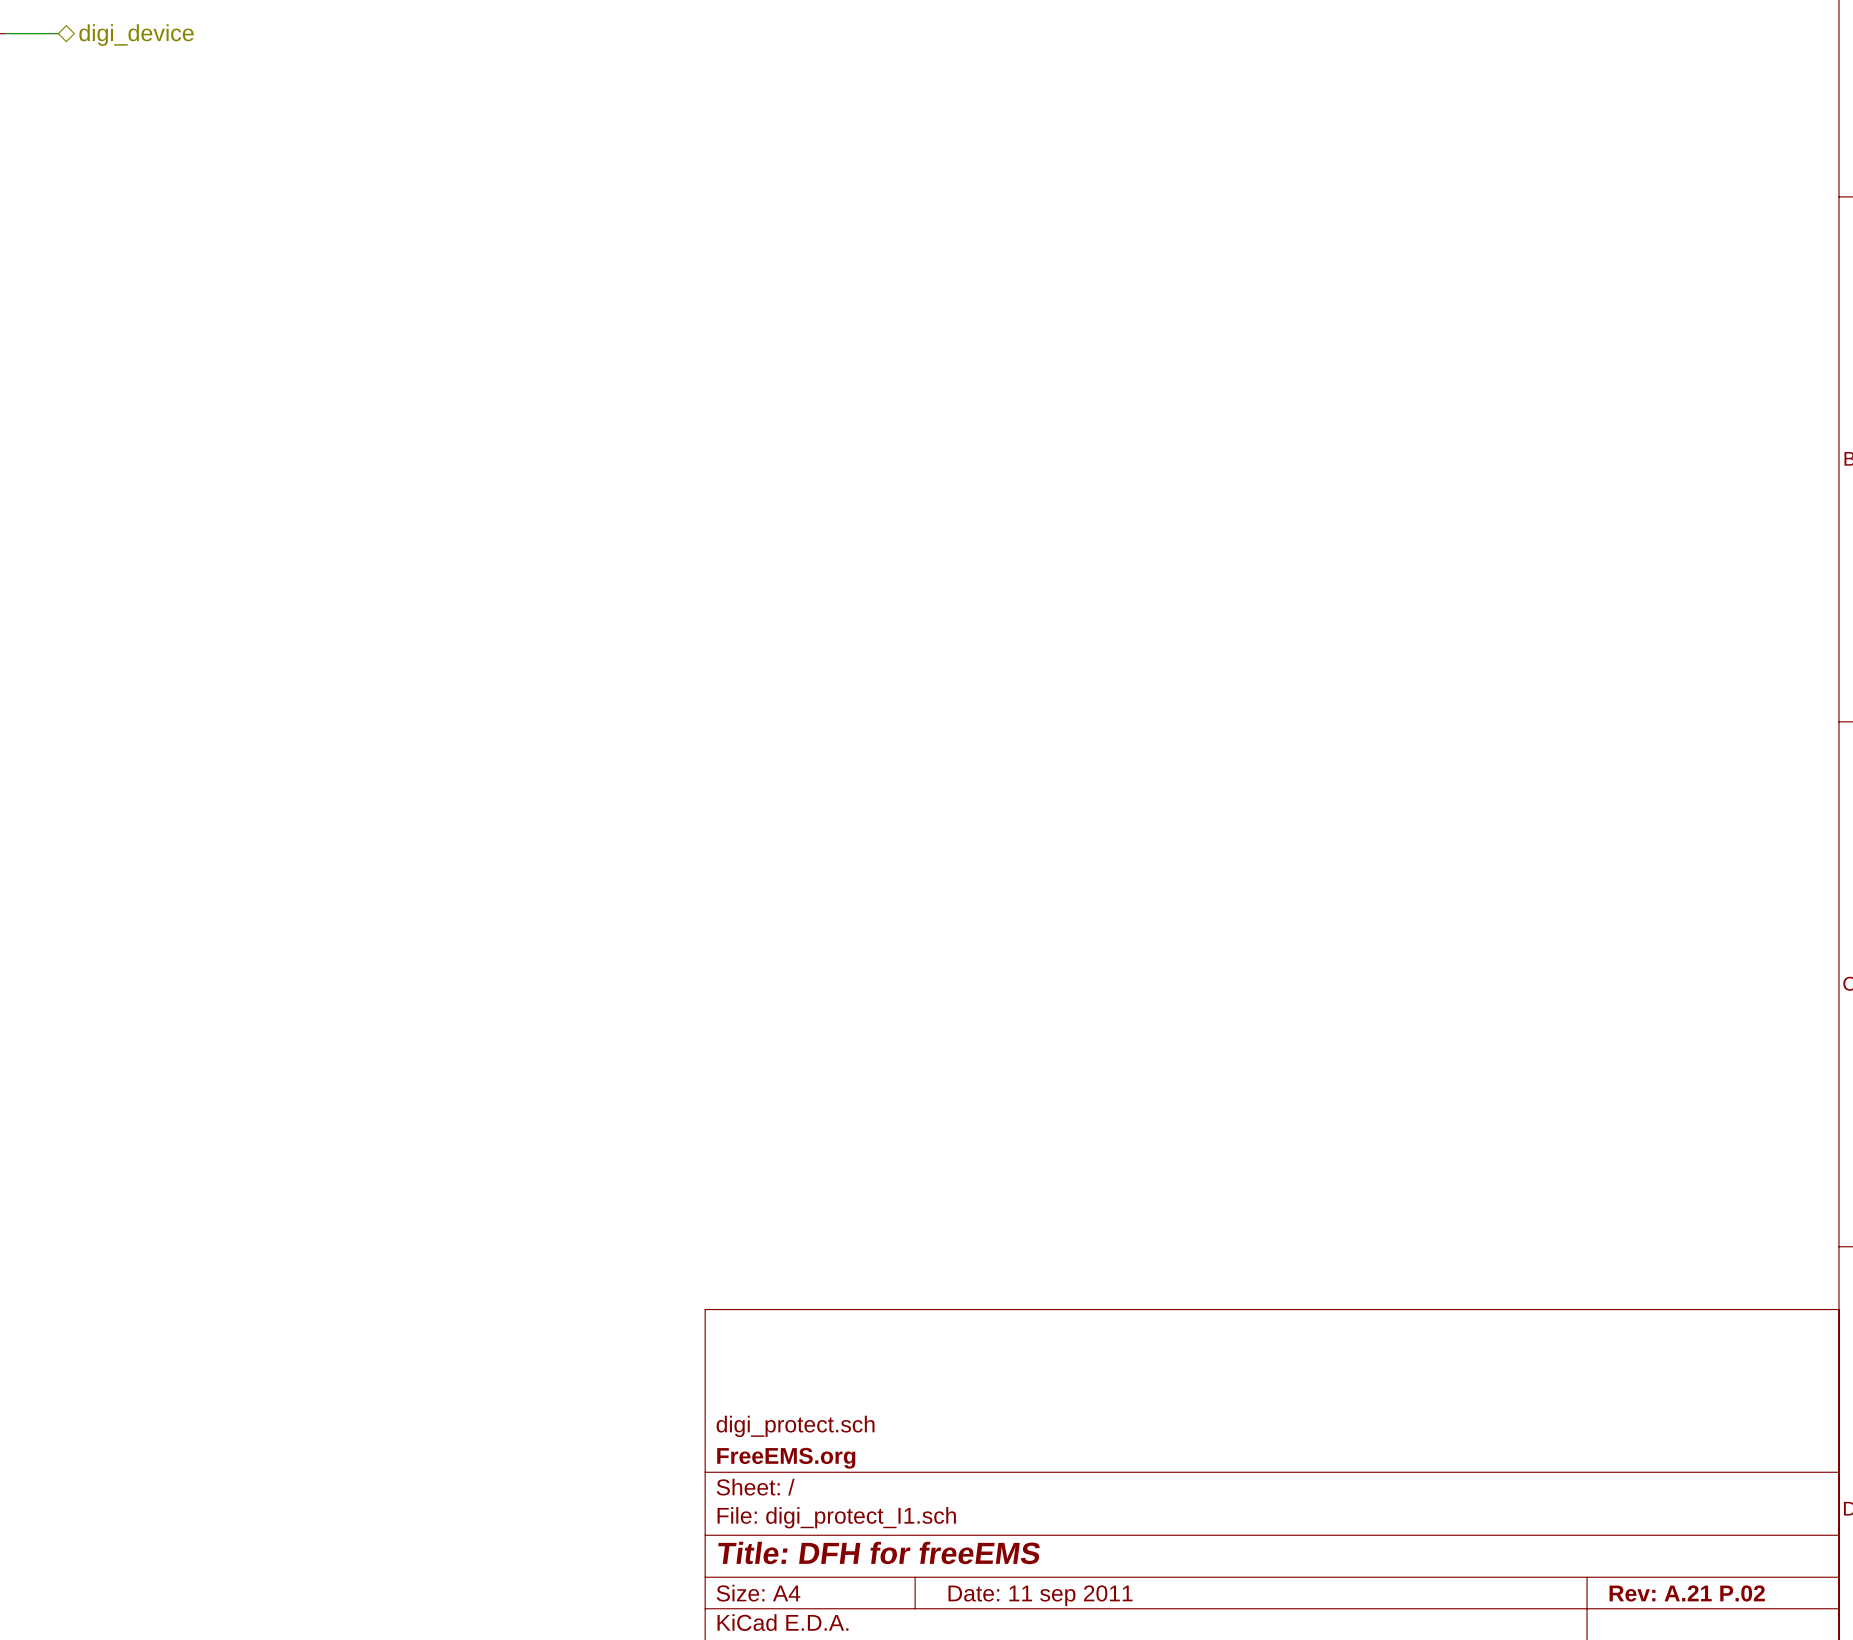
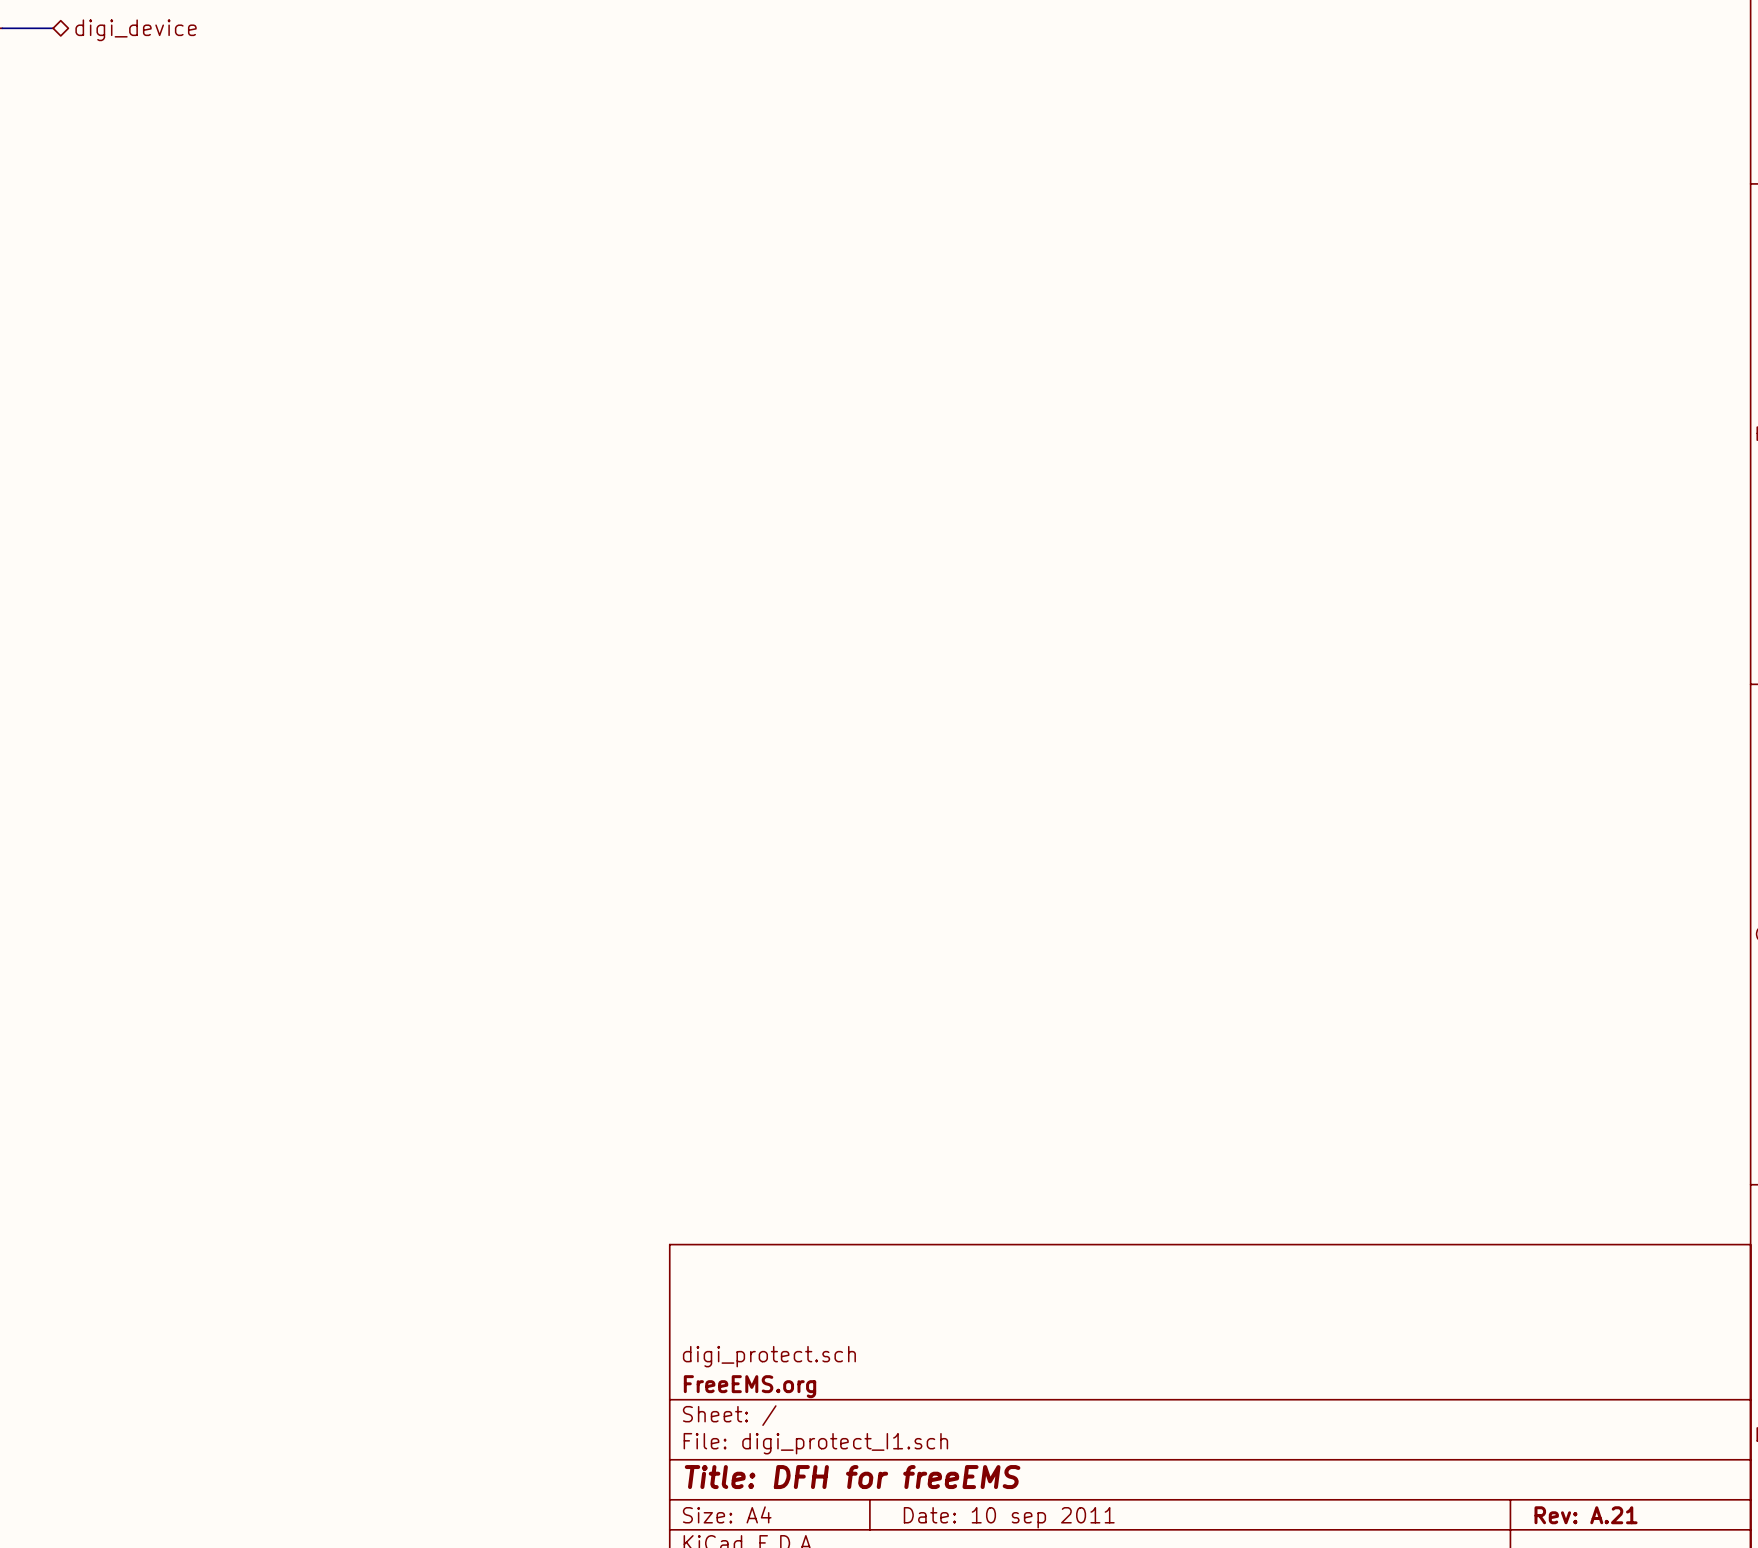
title block: Rev: A.21 P.02 (1687, 1593) -> Rev: A.21 (1586, 1515)
title block: Date: 11 sep 2011 (1040, 1595) -> Date: 10 sep 2011 (1009, 1517)

